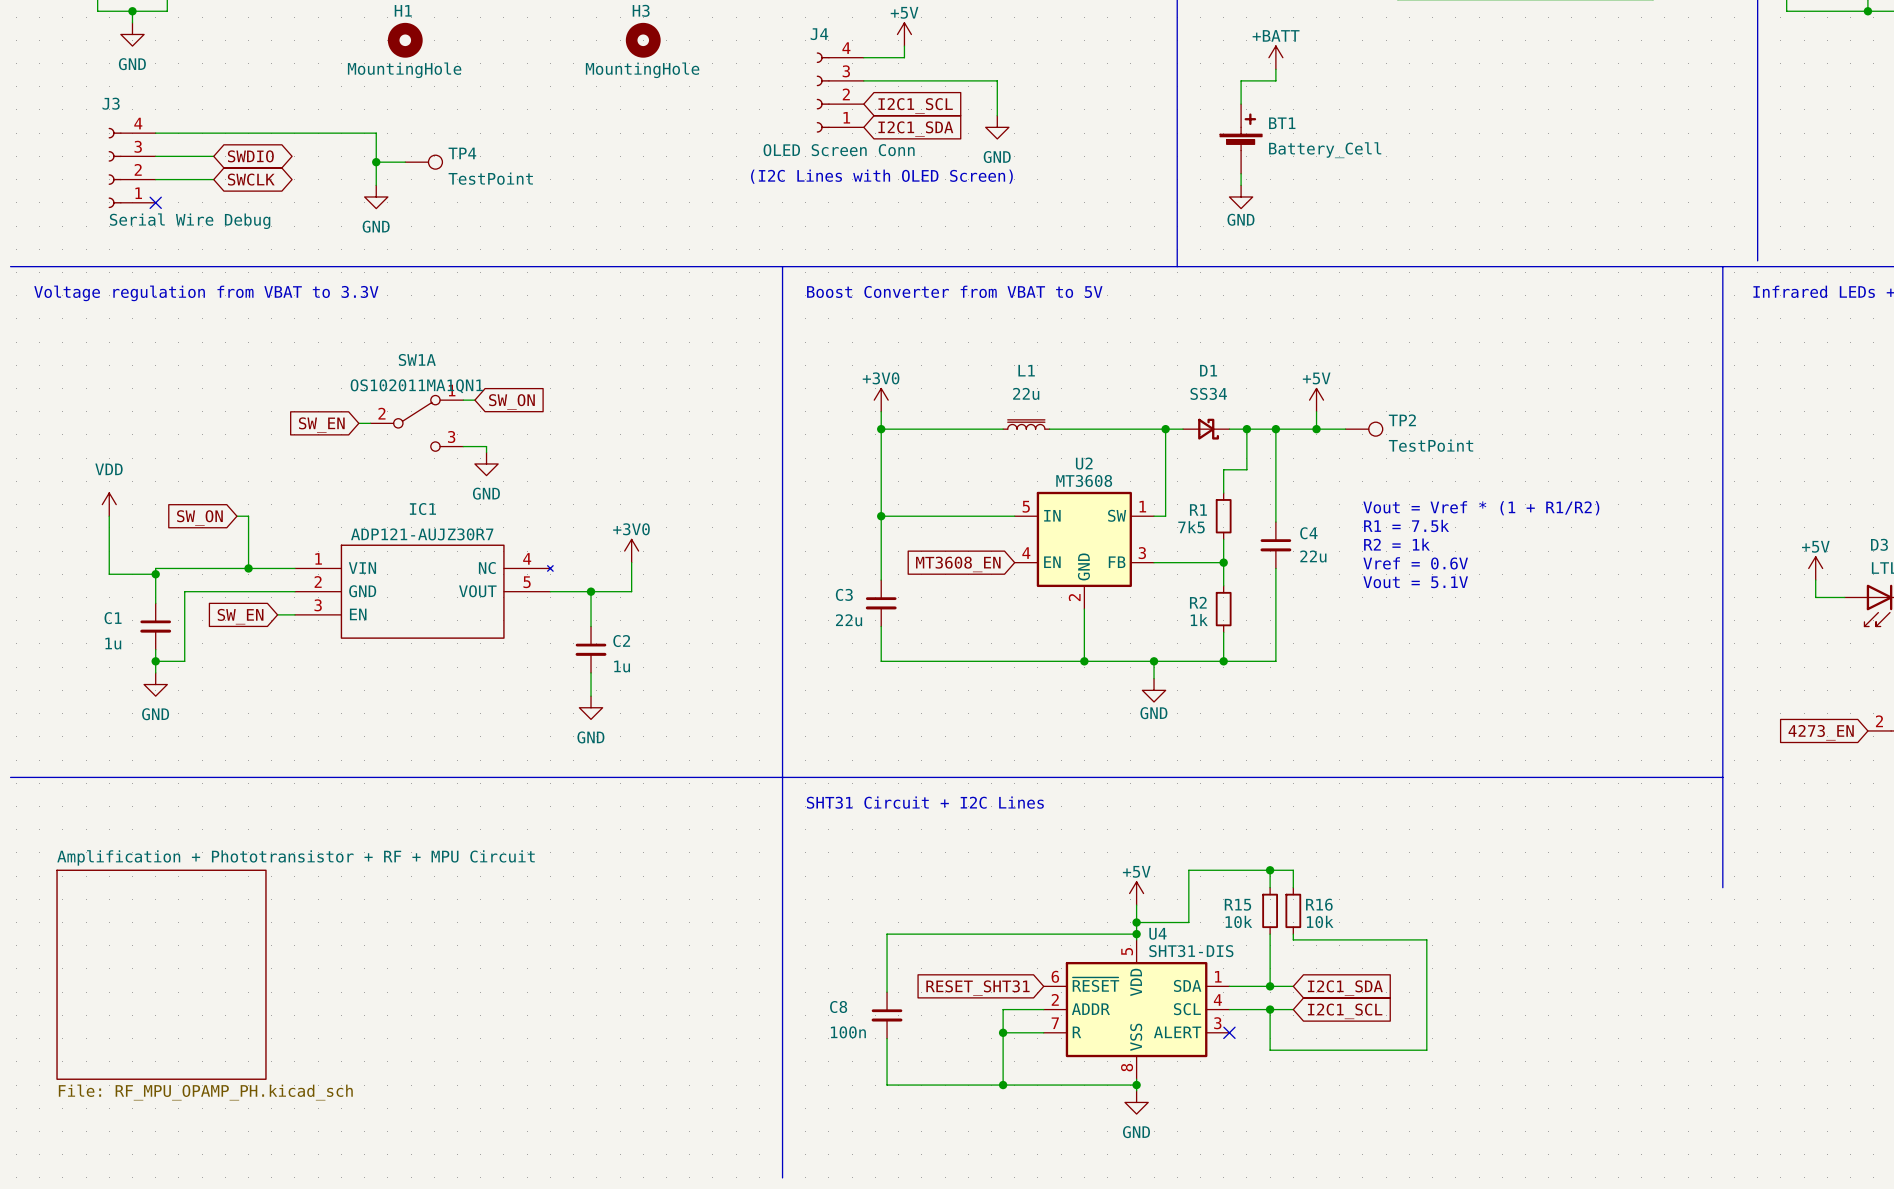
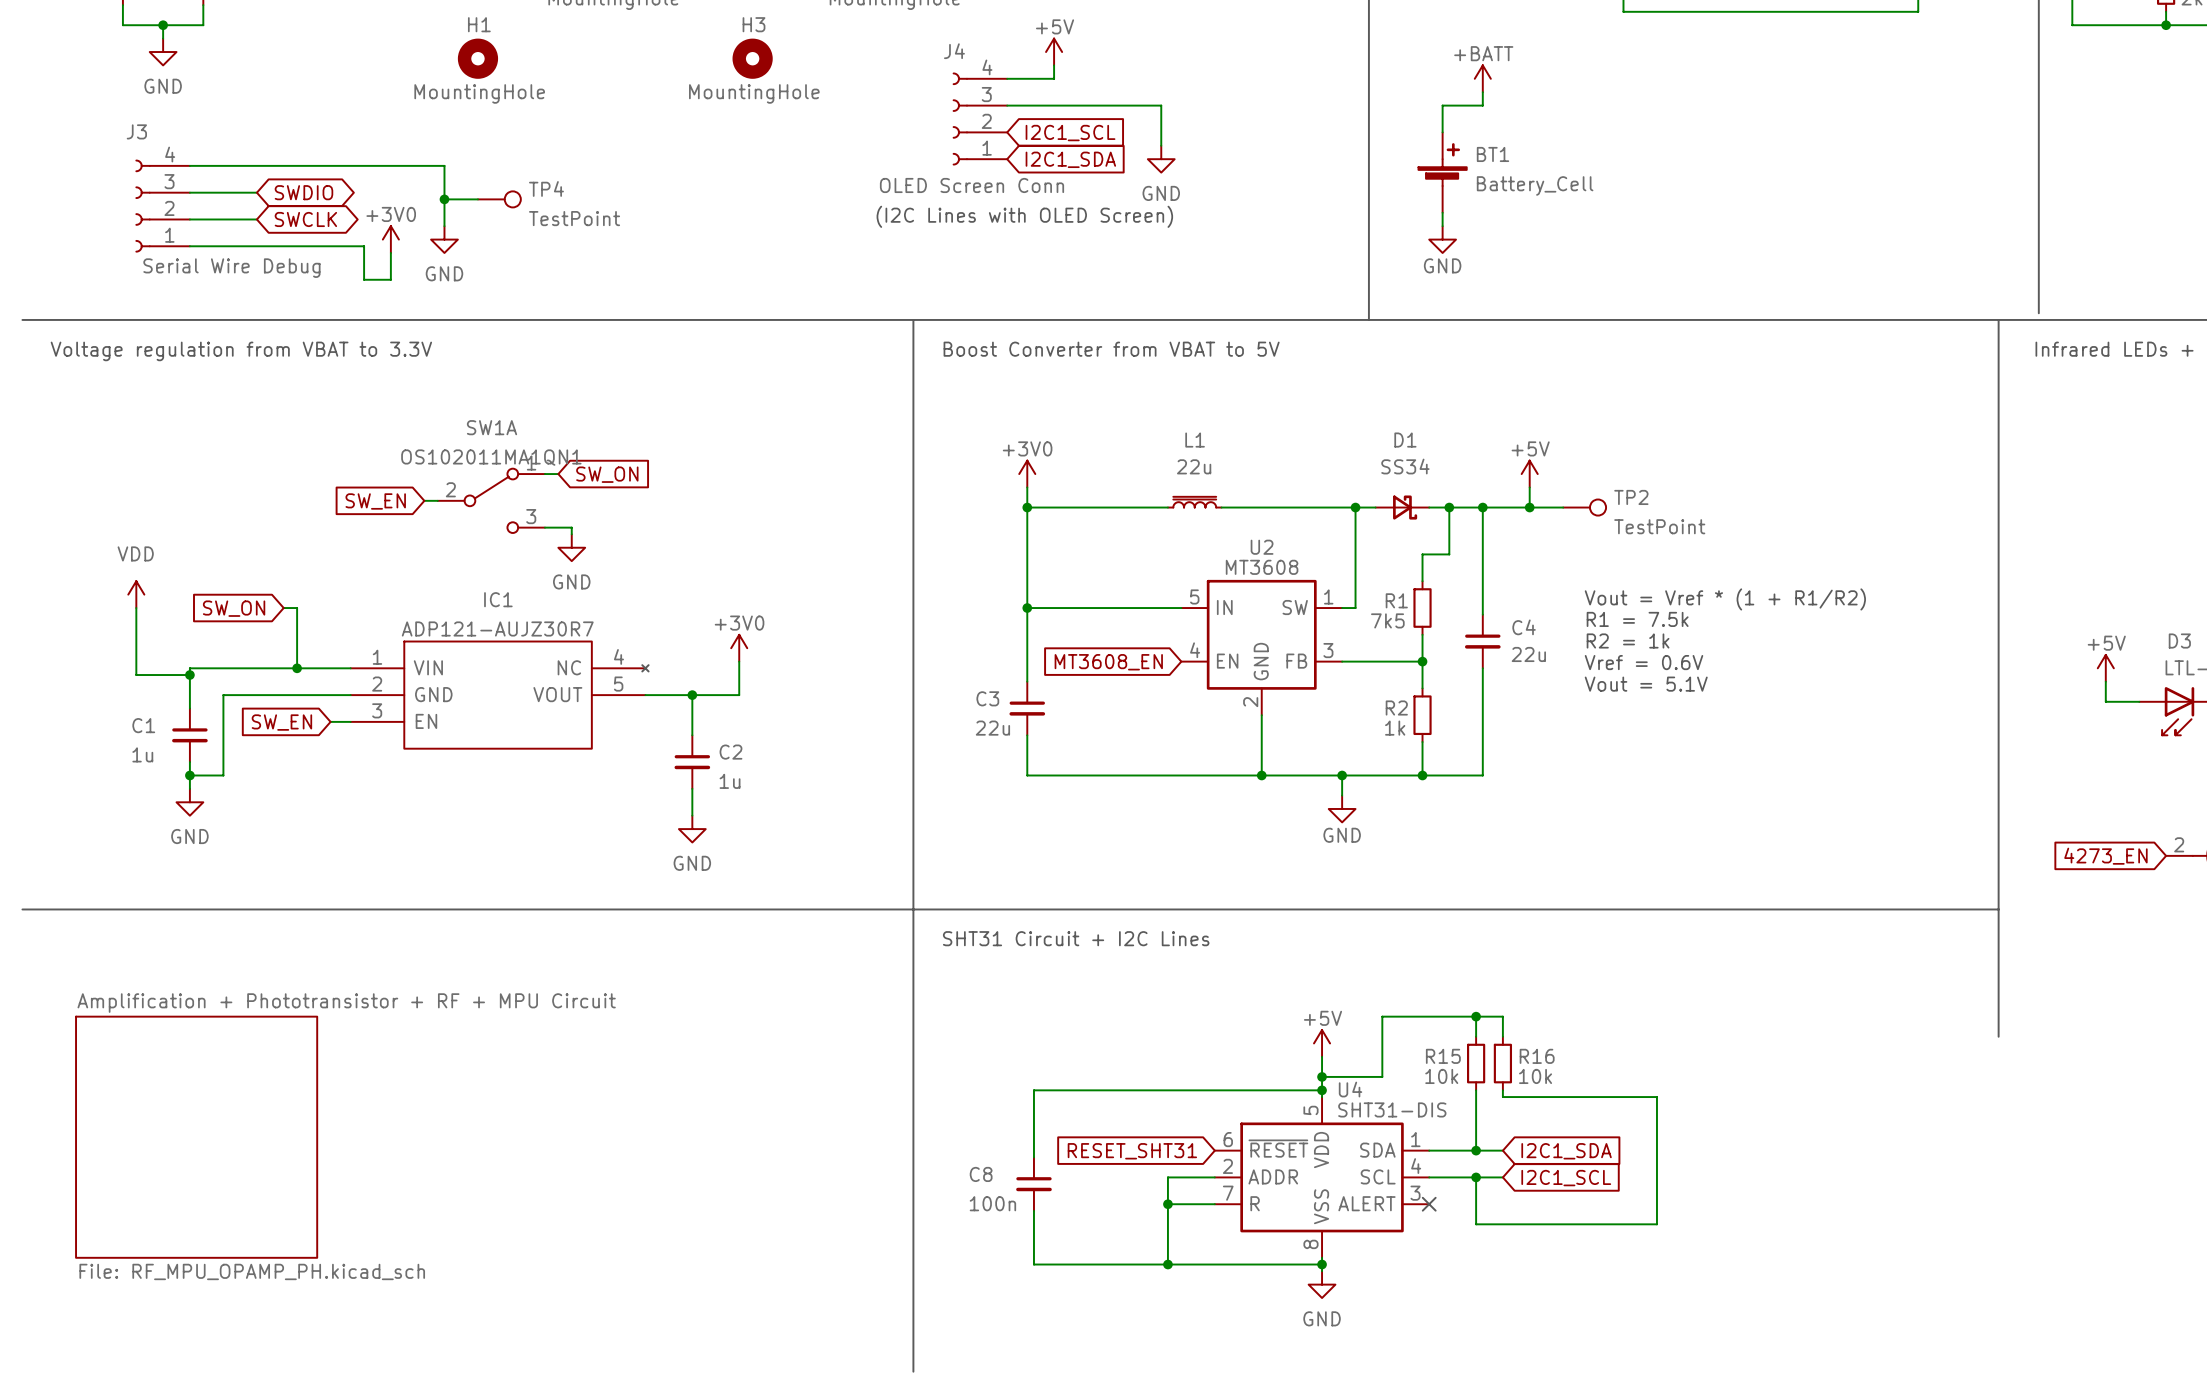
power symbol: none -> +3V0 (390, 239)
wire: none -> (189, 246) (364, 246) (364, 279) (390, 279) (390, 252)
no-connect mark: (155, 202) -> none

